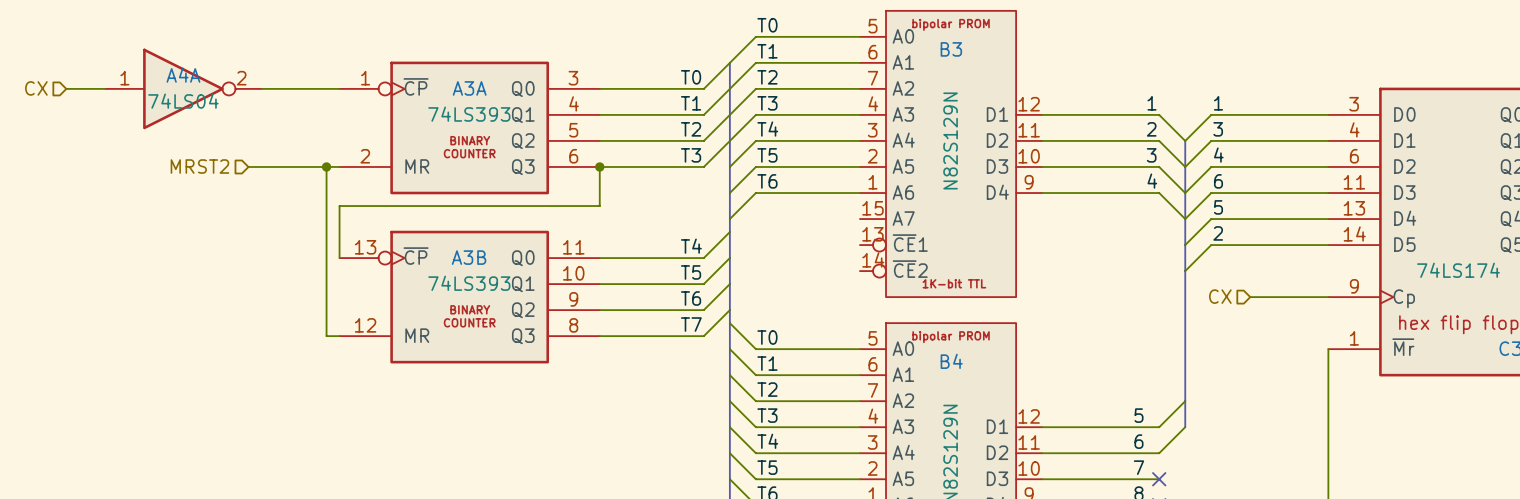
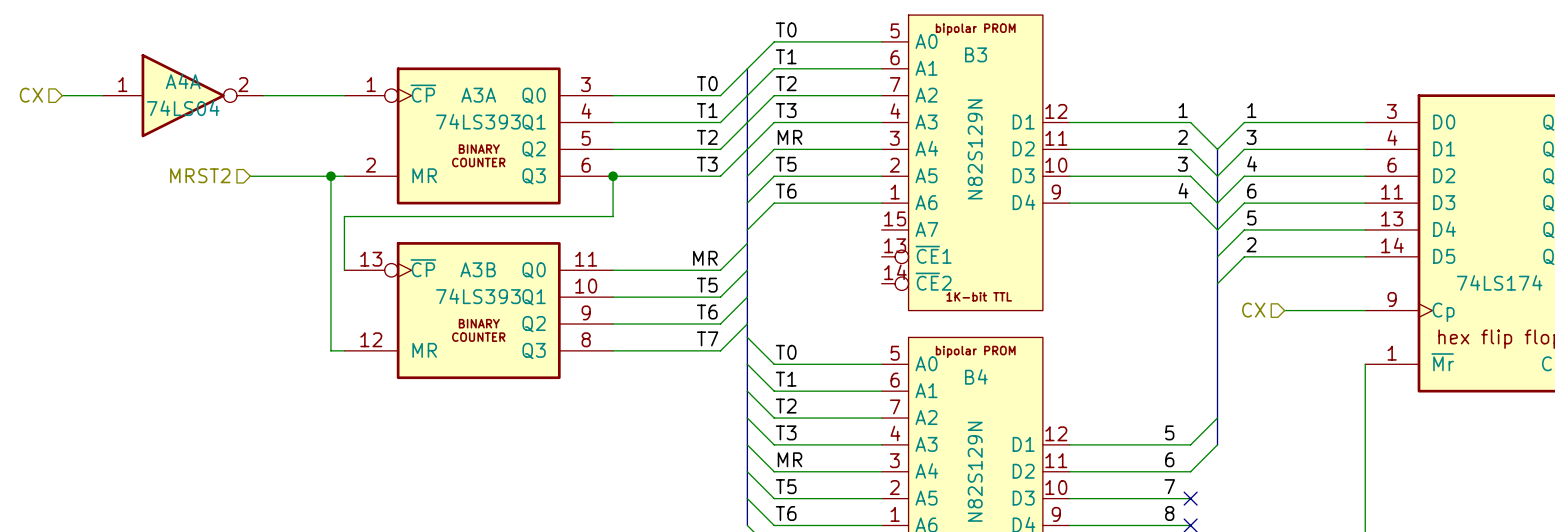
label: T4 (767, 129) -> MR (790, 137)
label: T4 (691, 246) -> MR (705, 258)
label: T4 (767, 441) -> MR (790, 459)

